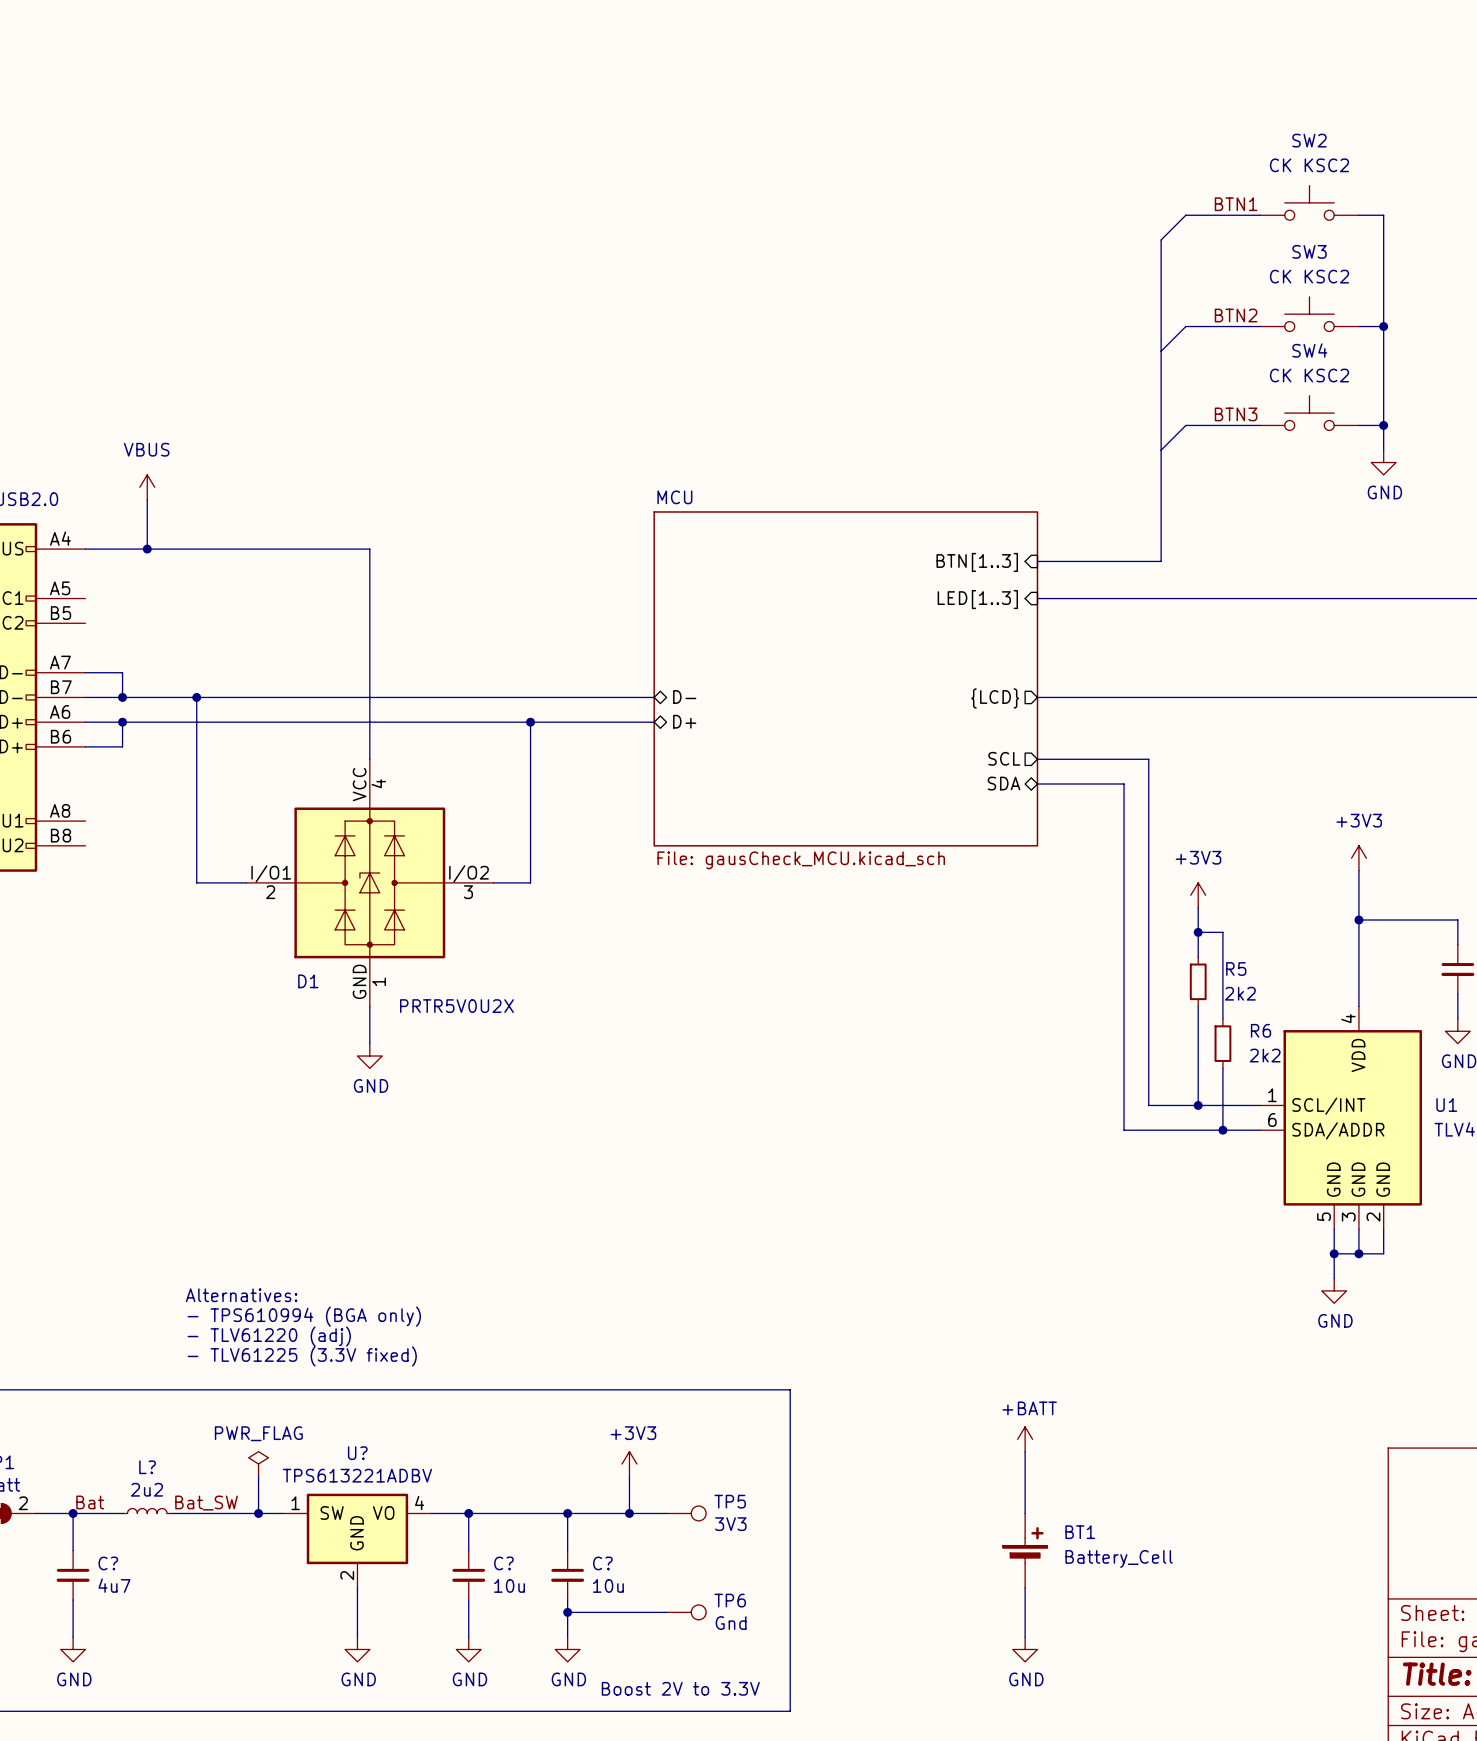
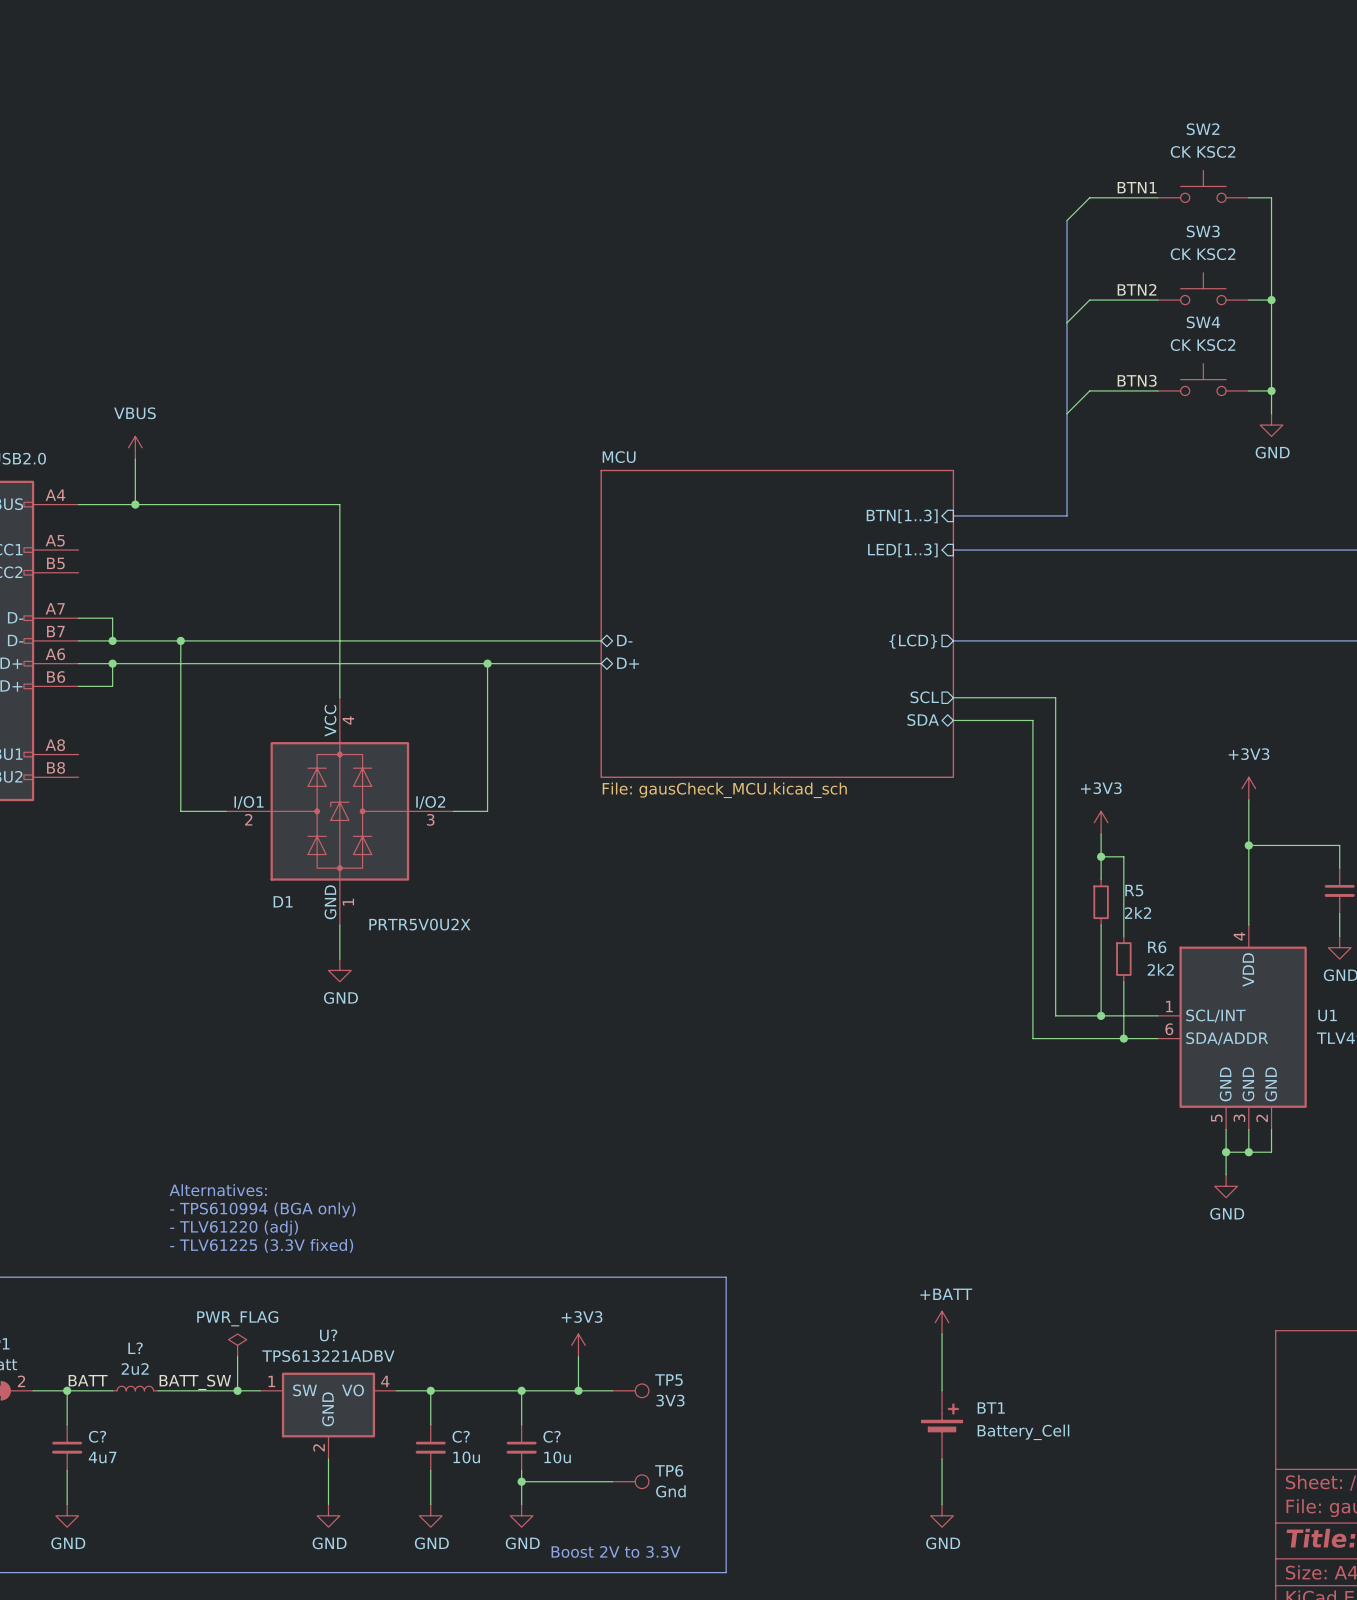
label: Bat (90, 1502) -> BATT (88, 1380)
label: Bat_SW (206, 1503) -> BATT_SW (195, 1382)

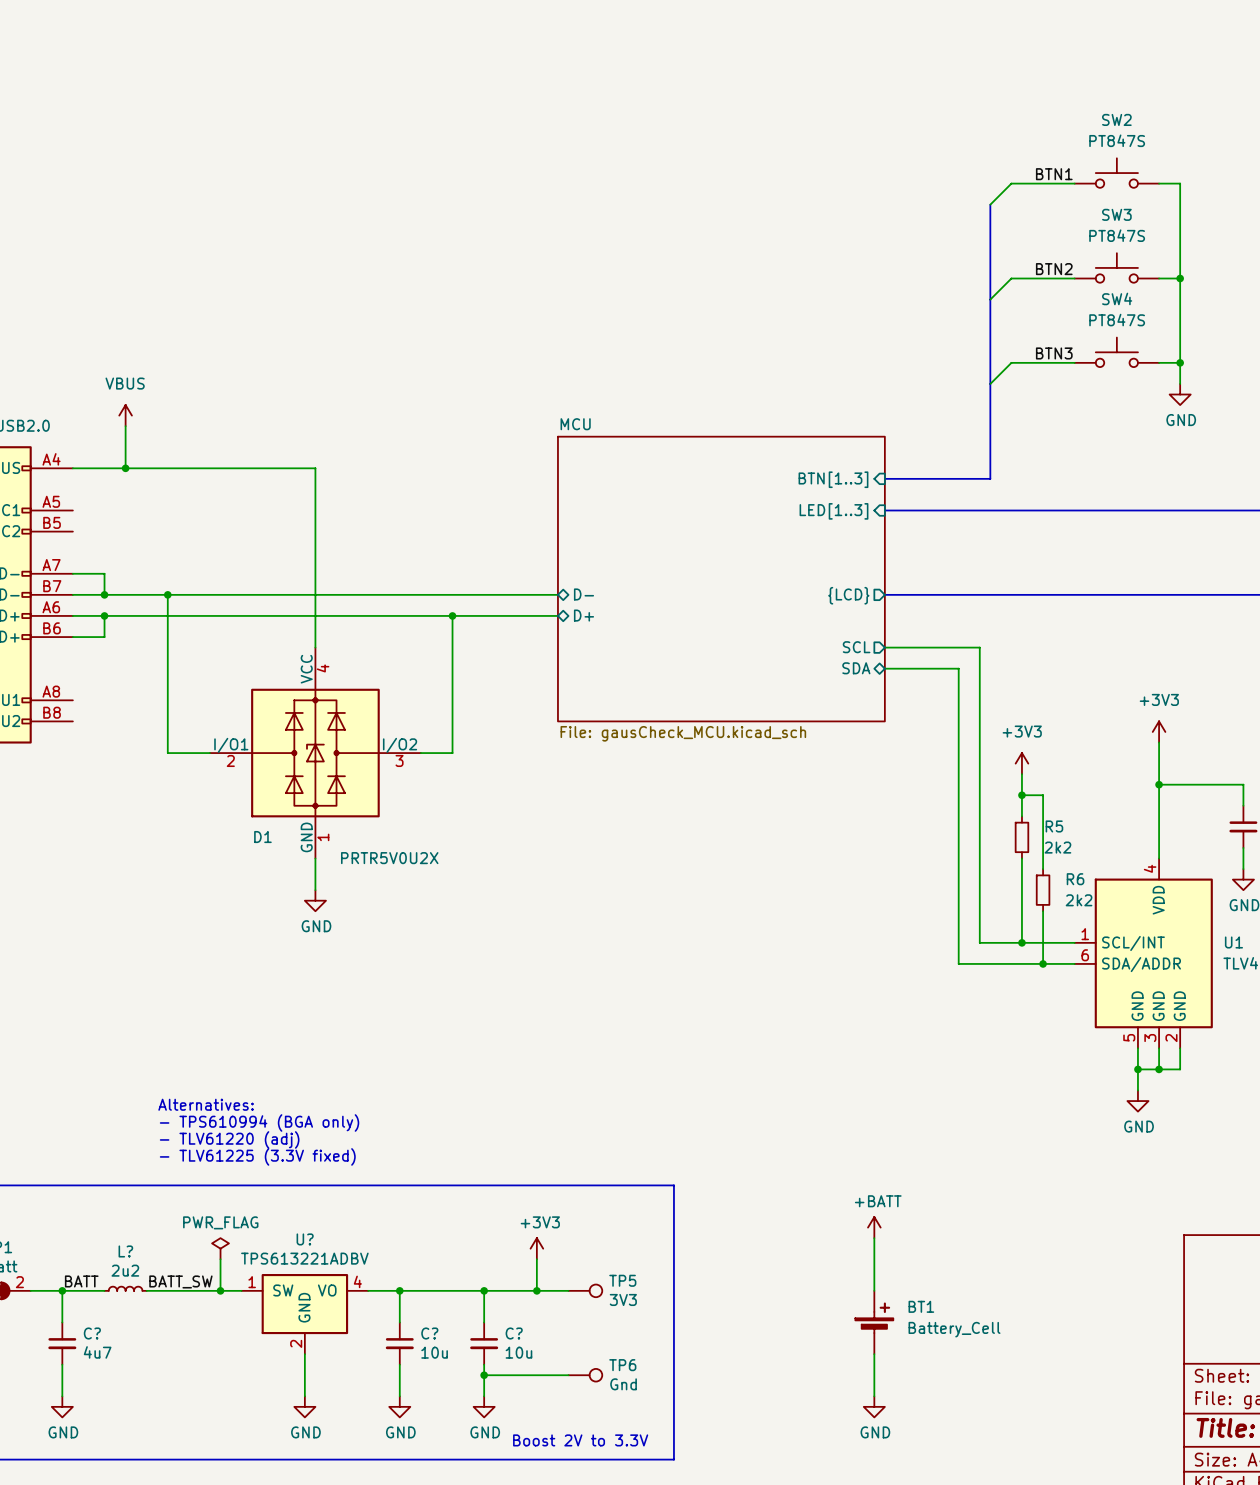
SW2 value: CK KSC2 (1203, 151) -> PT847S (1117, 140)
SW3 value: CK KSC2 (1203, 254) -> PT847S (1117, 235)
SW4 value: CK KSC2 (1203, 345) -> PT847S (1117, 320)

